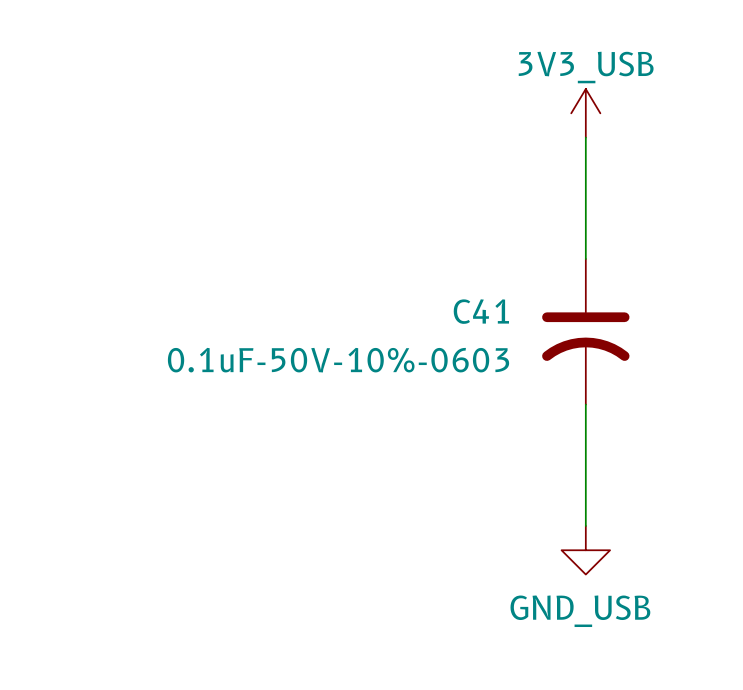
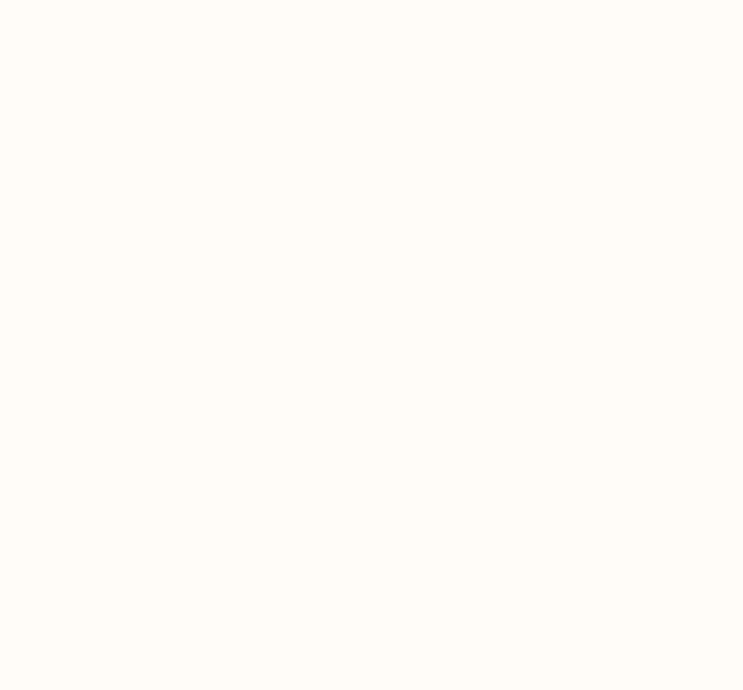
power symbol: 3V3_USB (585, 113) -> none
wire: (585, 137) (585, 258) -> none
C41: 0.1uF-50V-10%-0603 (585, 331) -> none
wire: (585, 404) (585, 525) -> none
power symbol: GND_USB (585, 550) -> none

